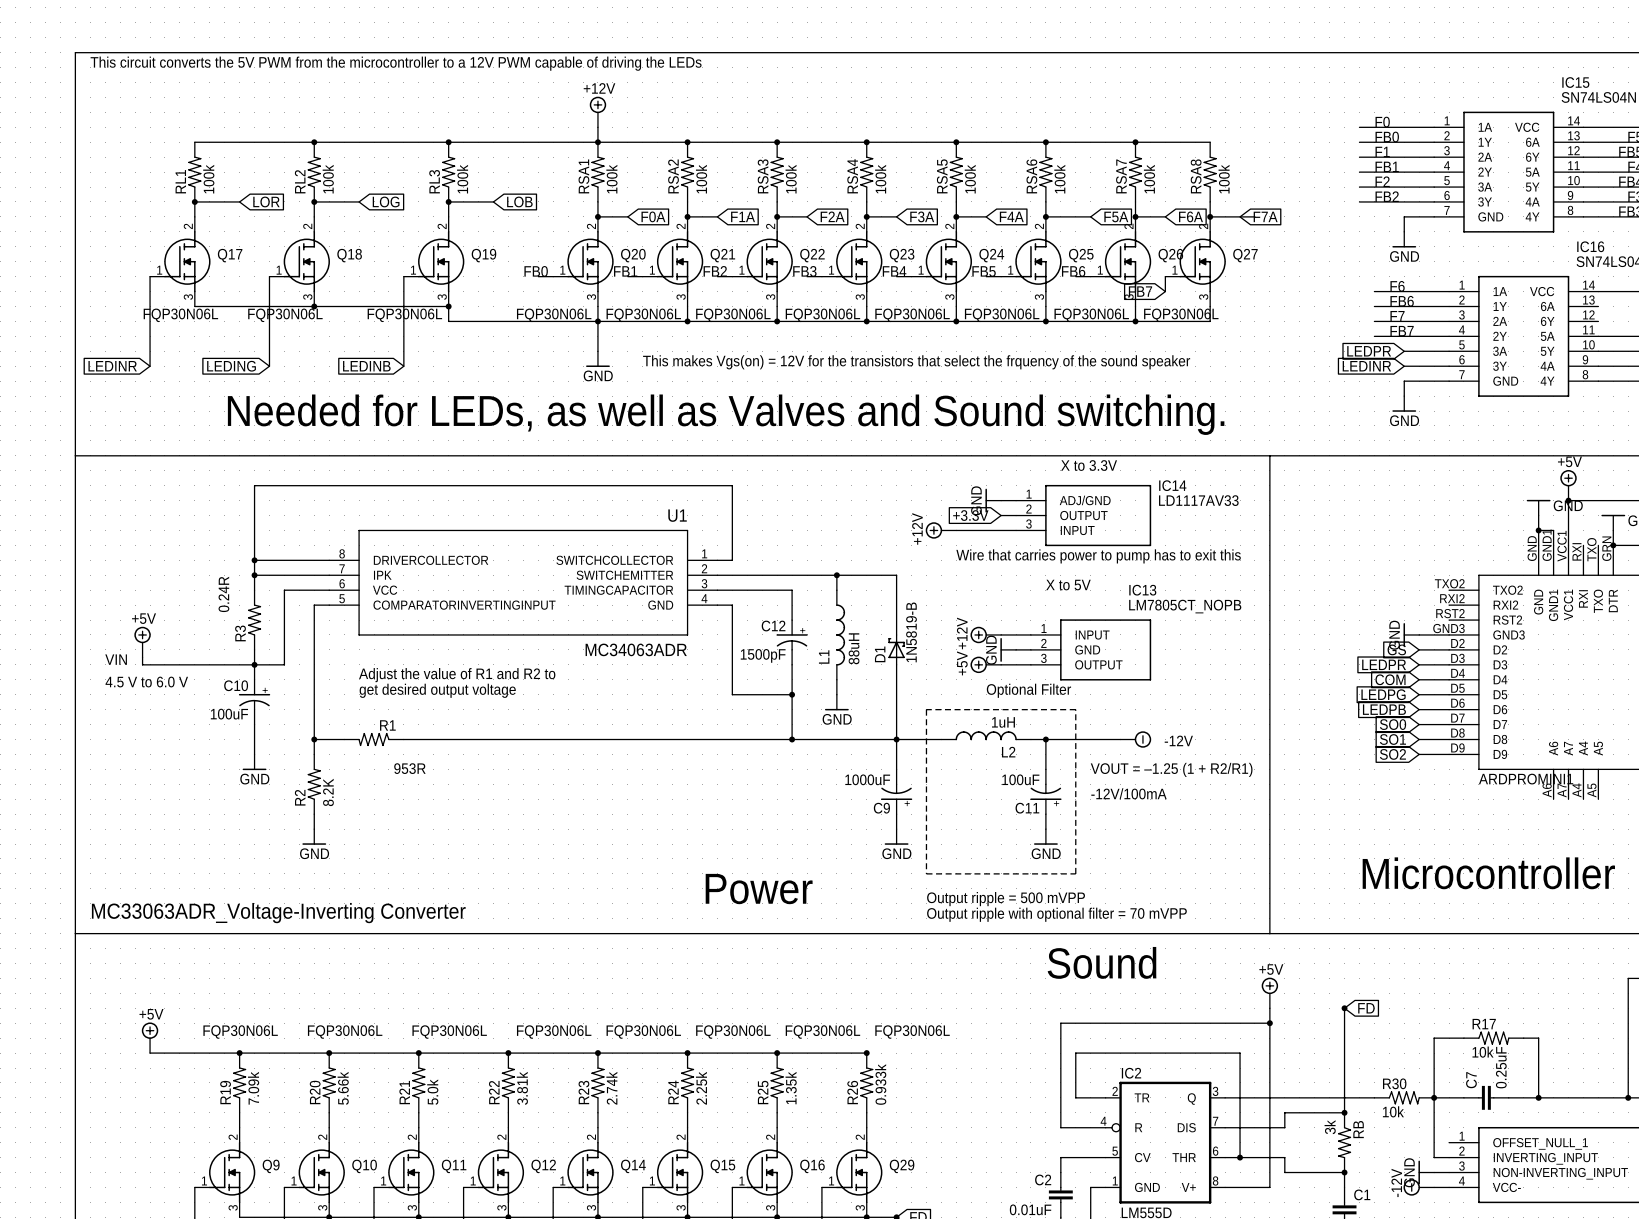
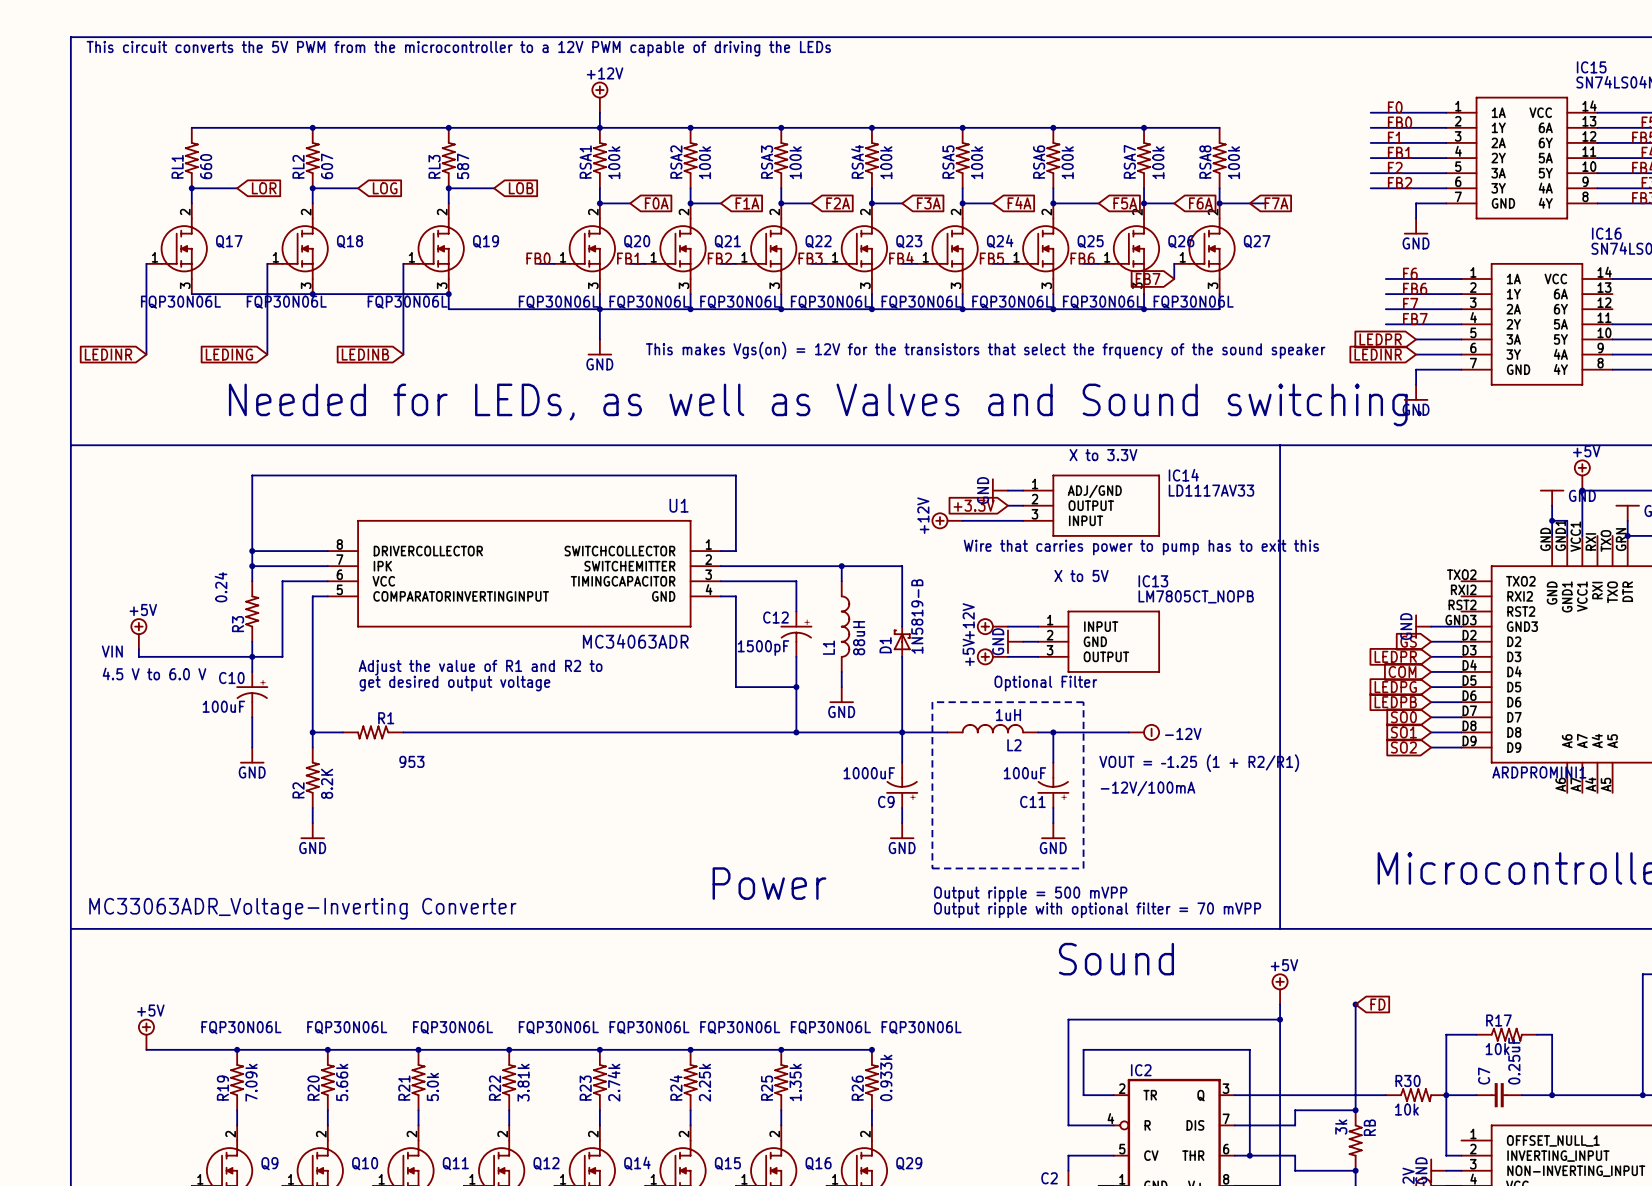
RL1 value: 100k (208, 179) -> 660 (206, 166)
RL2 value: 100k (328, 179) -> 607 (327, 166)
RL3 value: 100k (462, 179) -> 587 (463, 166)
R3 value: 0.24R (223, 594) -> 0.24 (221, 587)
R1 value: 953R (409, 768) -> 953 (411, 761)

